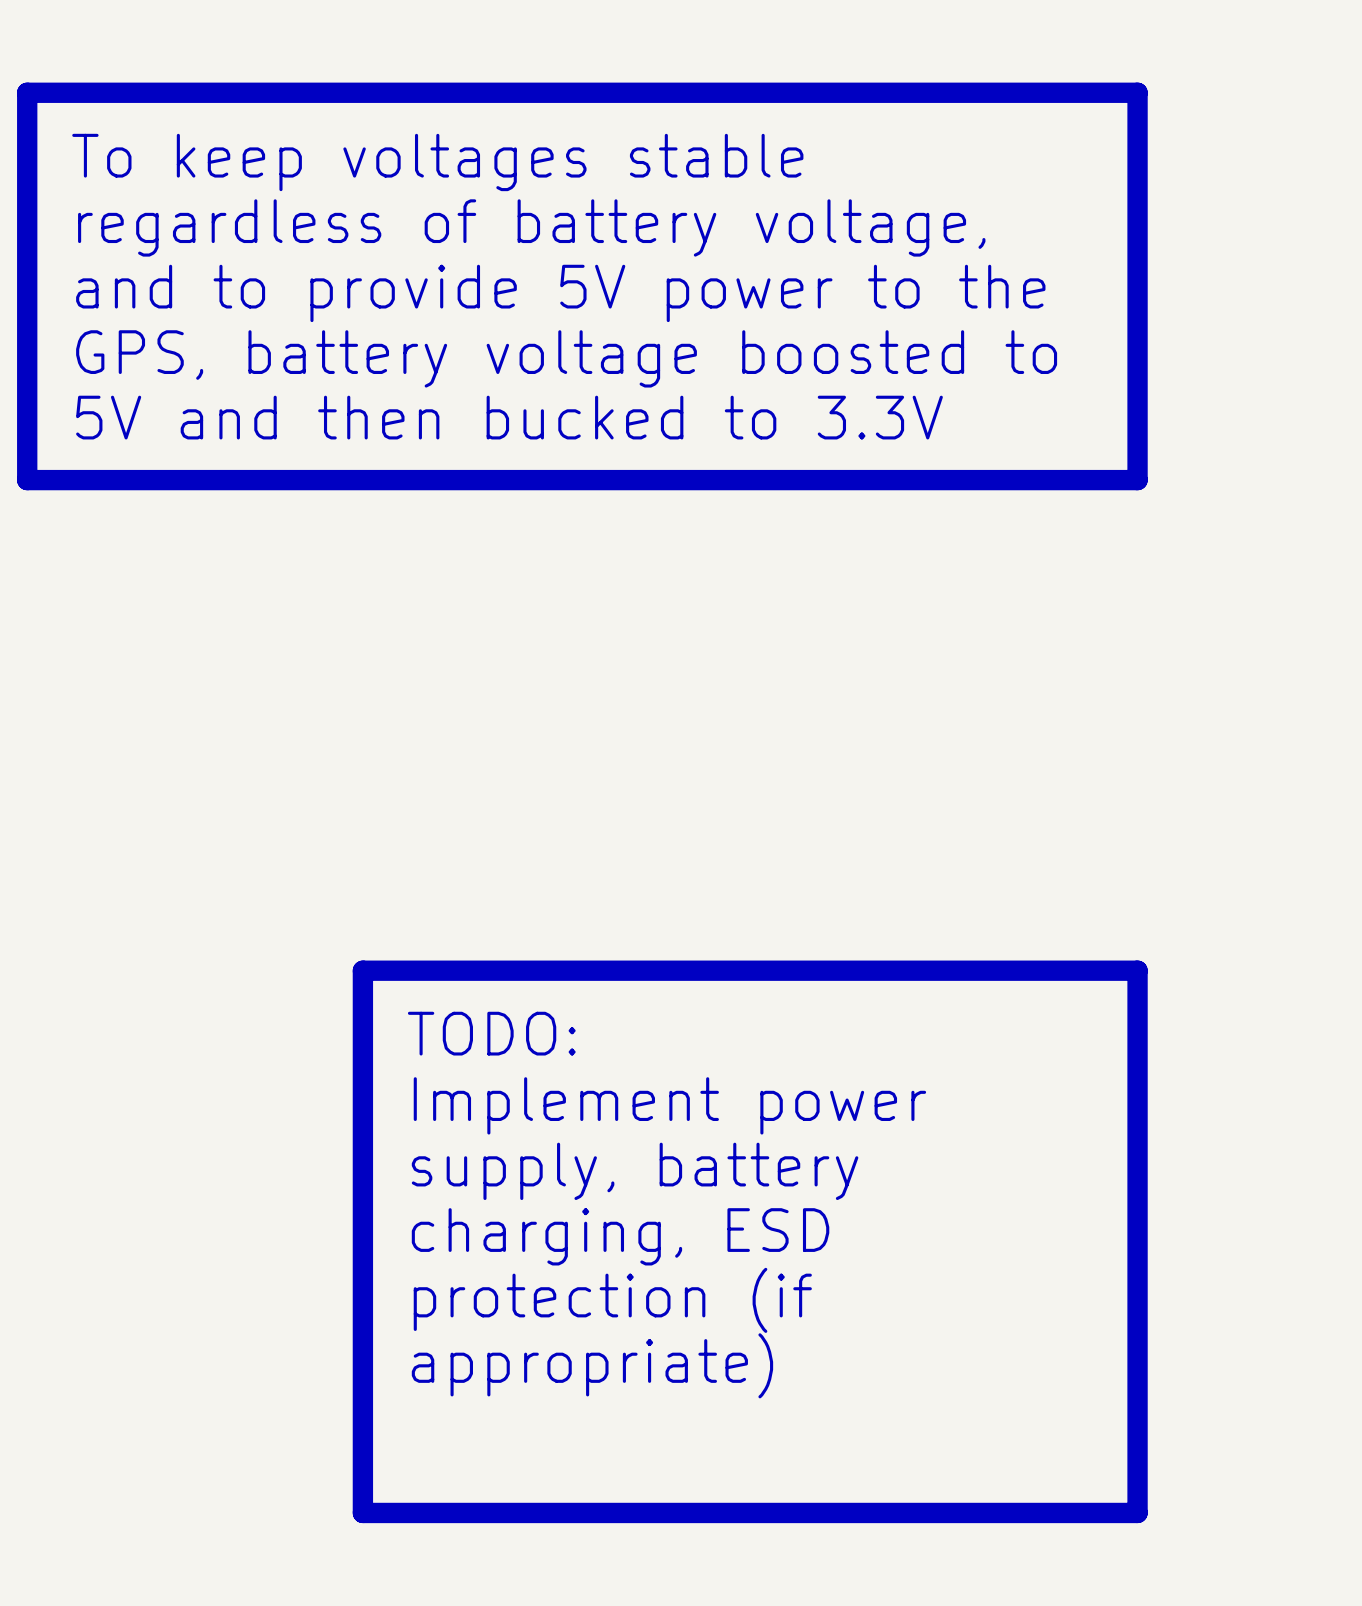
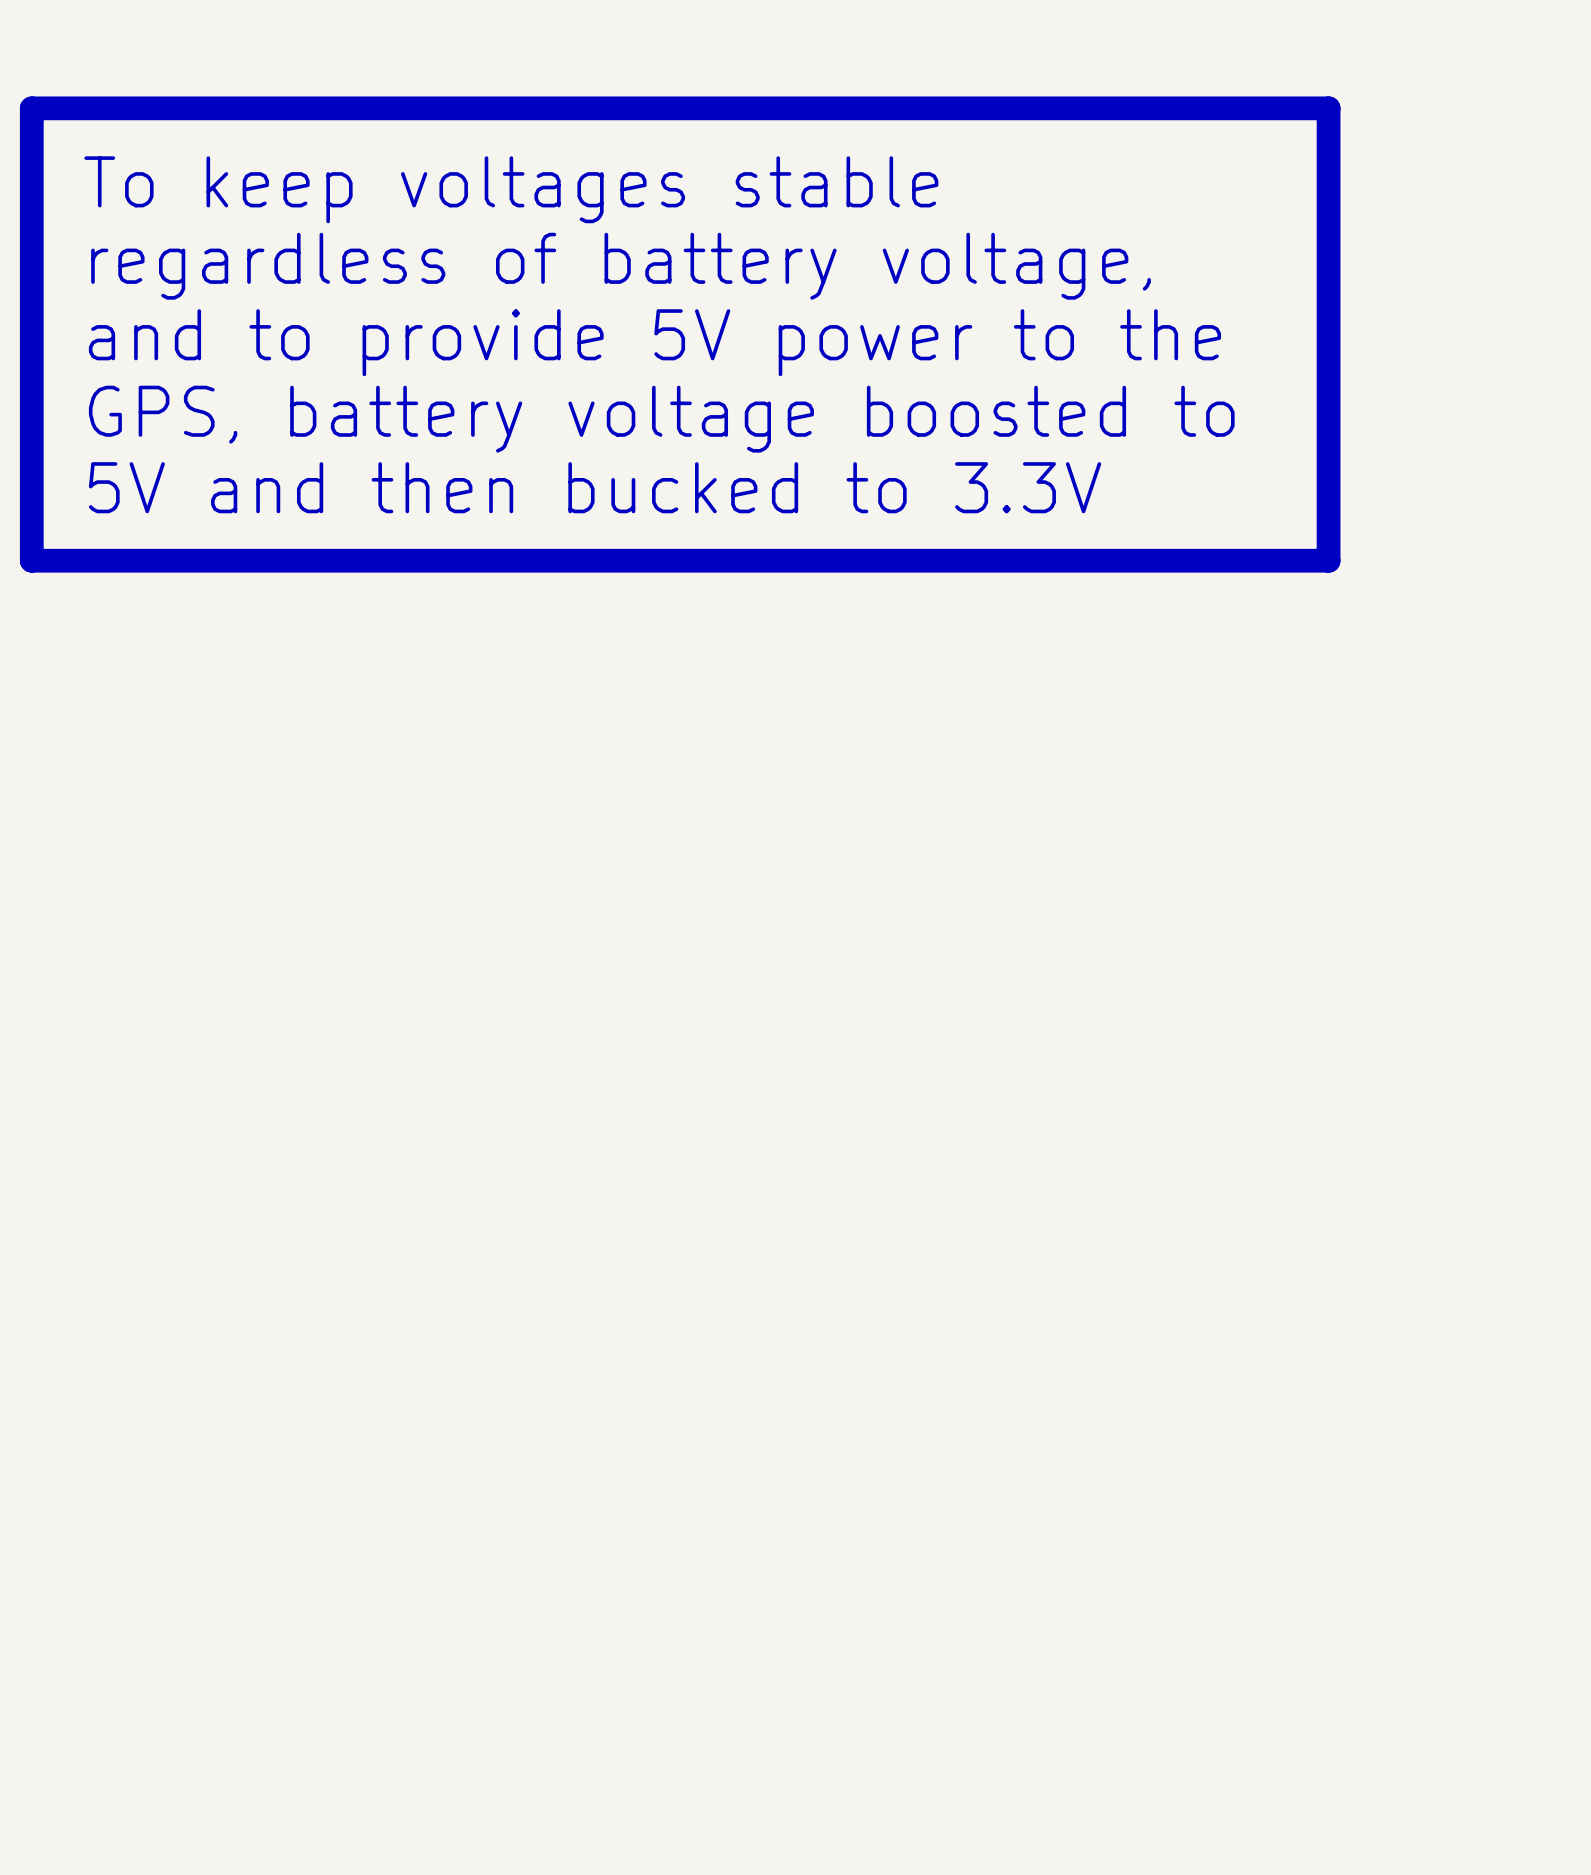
line: (362, 970) (1137, 970) (1137, 1512) (362, 1512) (362, 970) -> none
text: TODO: (491, 1033) -> none
text: Implement power (669, 1105) -> none
text: supply, battery (635, 1171) -> none
text: charging, ESD (620, 1236) -> none
text: protection (if (612, 1300) -> none
text: appropriate) (592, 1365) -> none

